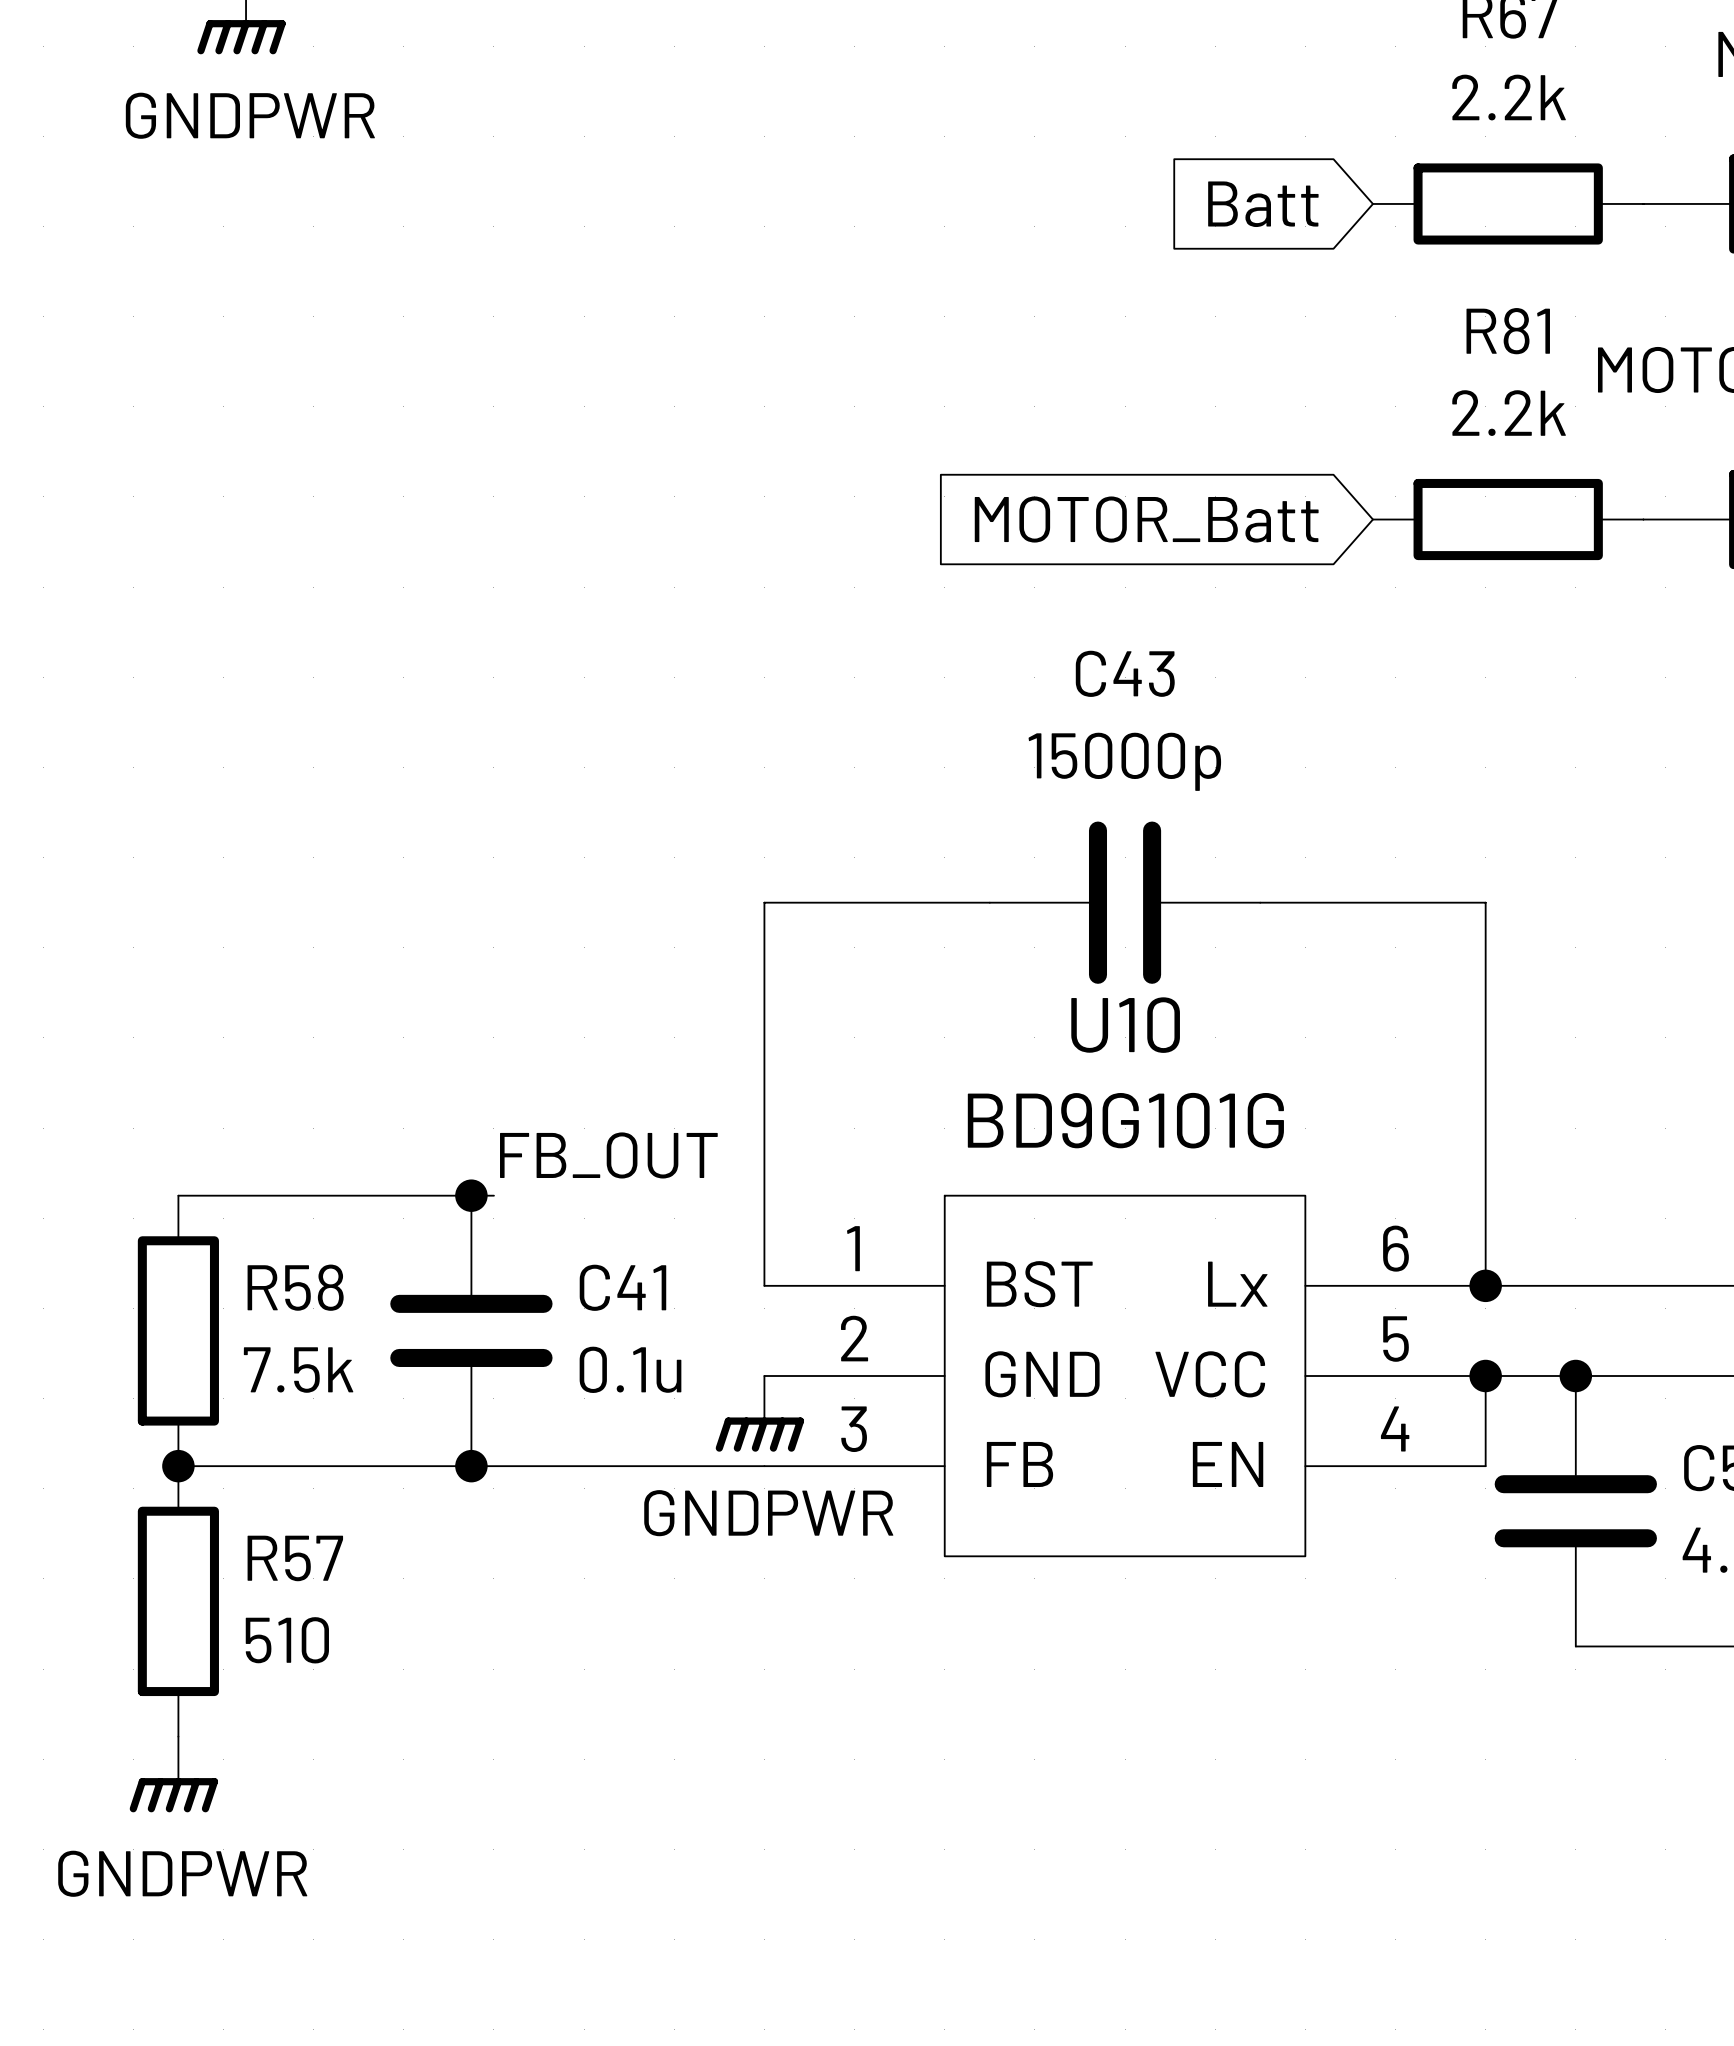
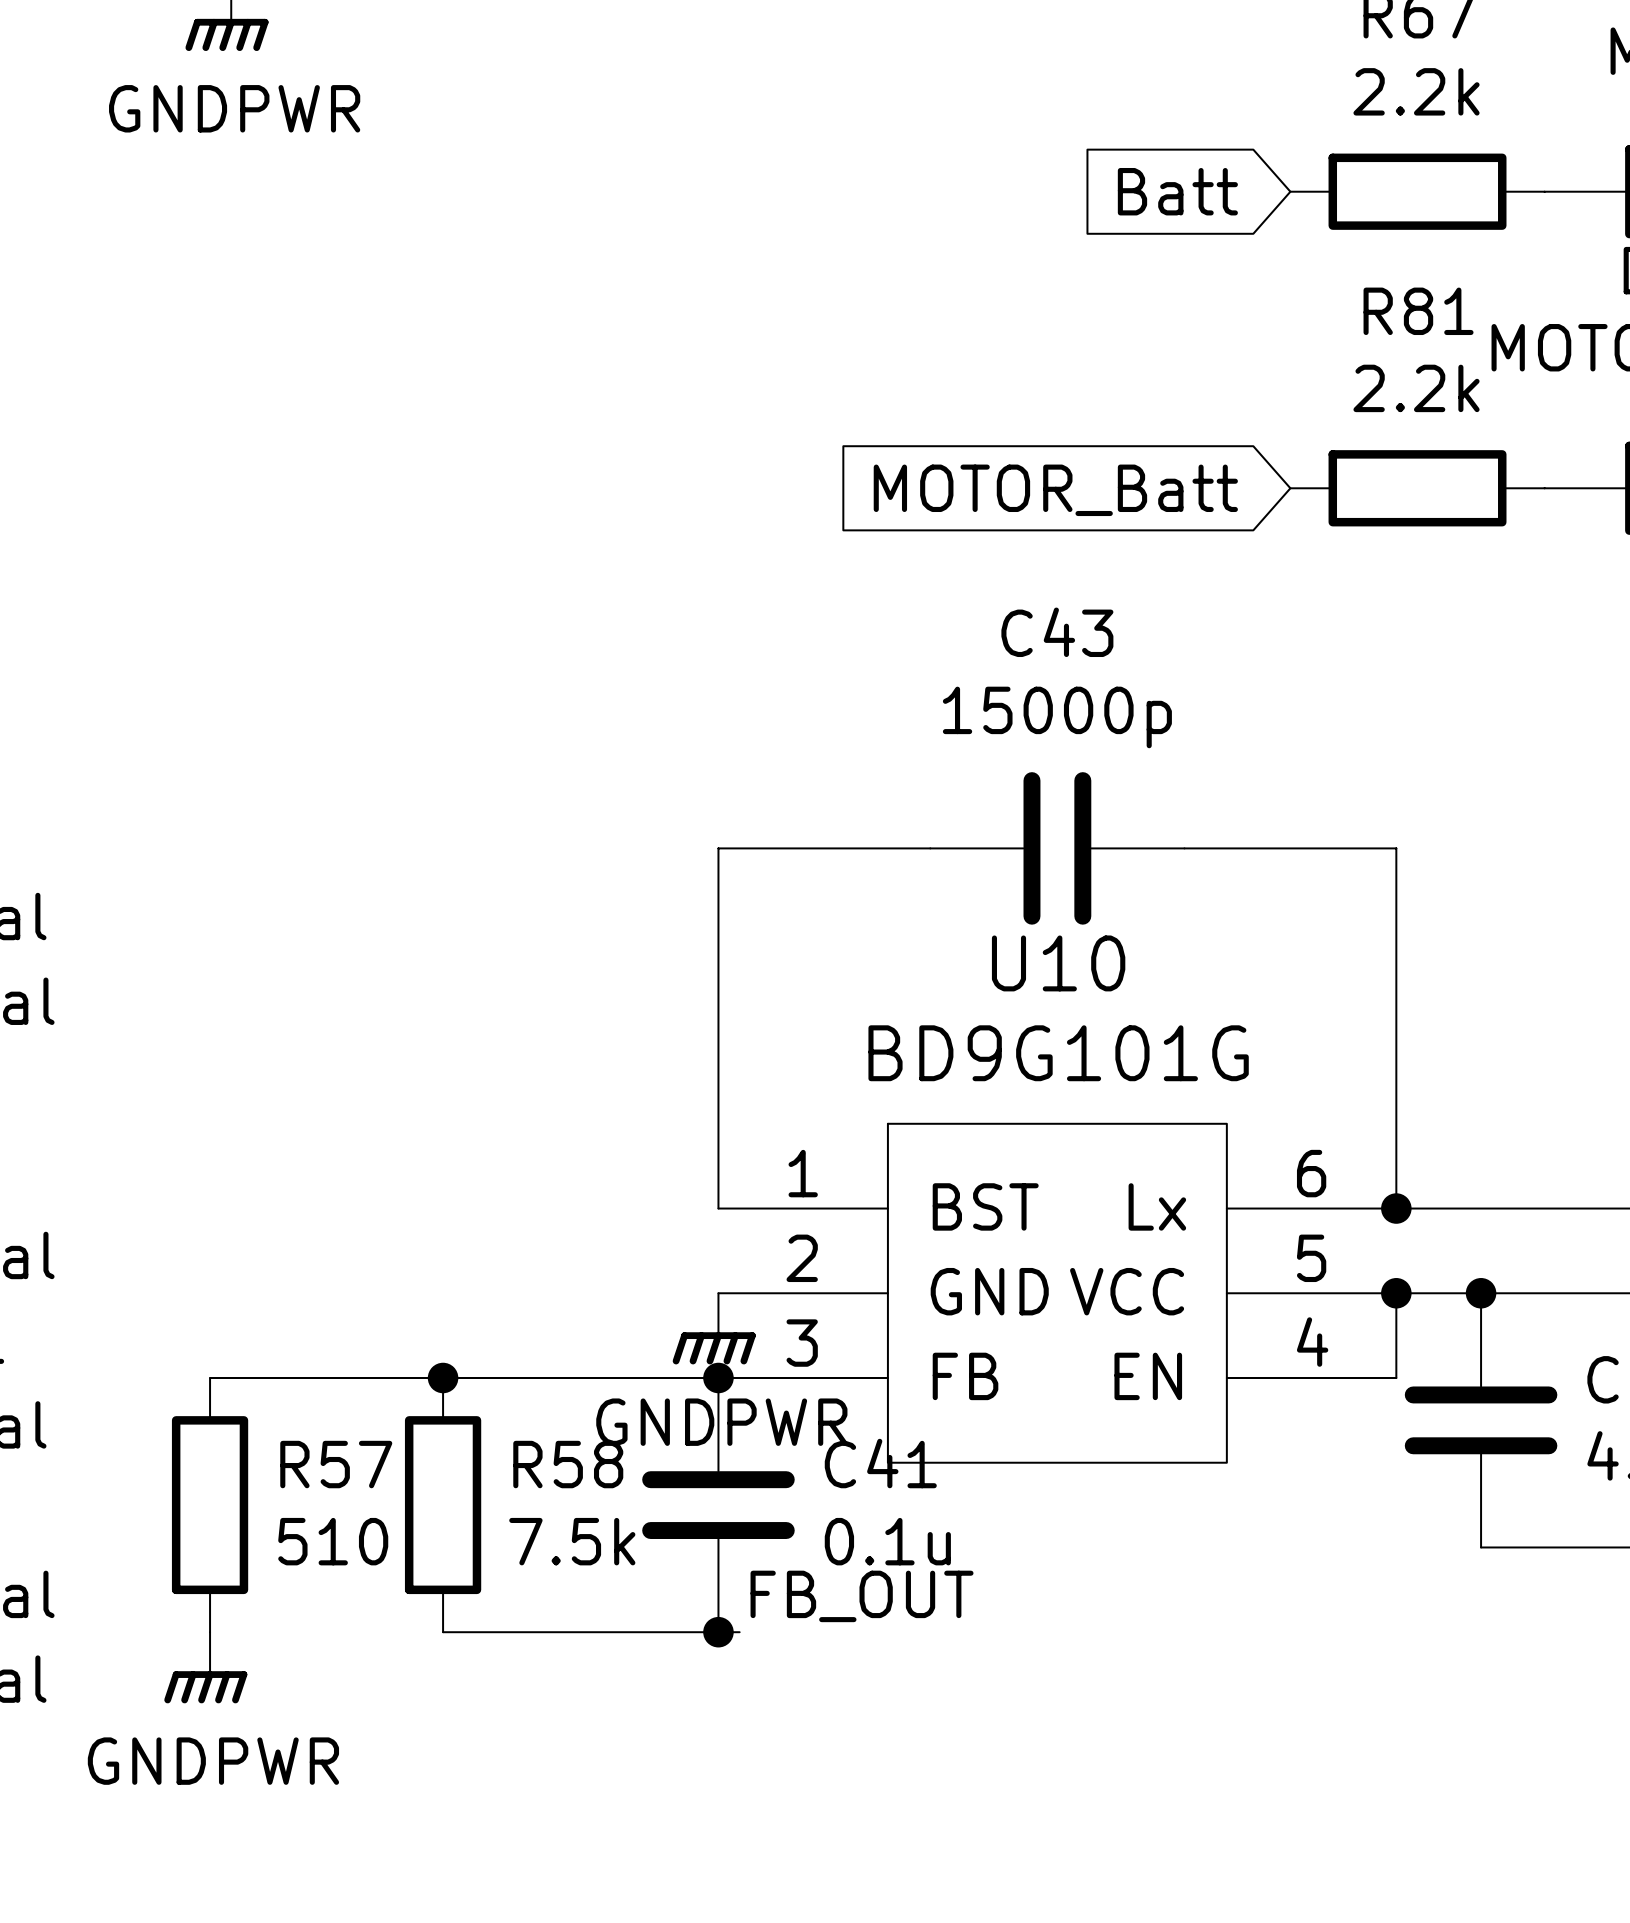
label position: FB_OUT (608, 1155) -> FB_OUT (862, 1596)
wire: (178, 1195) (493, 1195) -> (443, 1632) (739, 1632)
junction: (471, 1195) -> none
R58 position: (178, 1330) -> (443, 1505)
C41 position: (471, 1330) -> (718, 1505)
wire: (178, 1466) (223, 1466) -> none
junction: (178, 1466) -> none
junction: none -> (718, 1378)
R57 position: (178, 1601) -> (210, 1505)
junction: none -> (718, 1632)
power symbol position: GNDPWR (173, 1774) -> GNDPWR (205, 1667)

